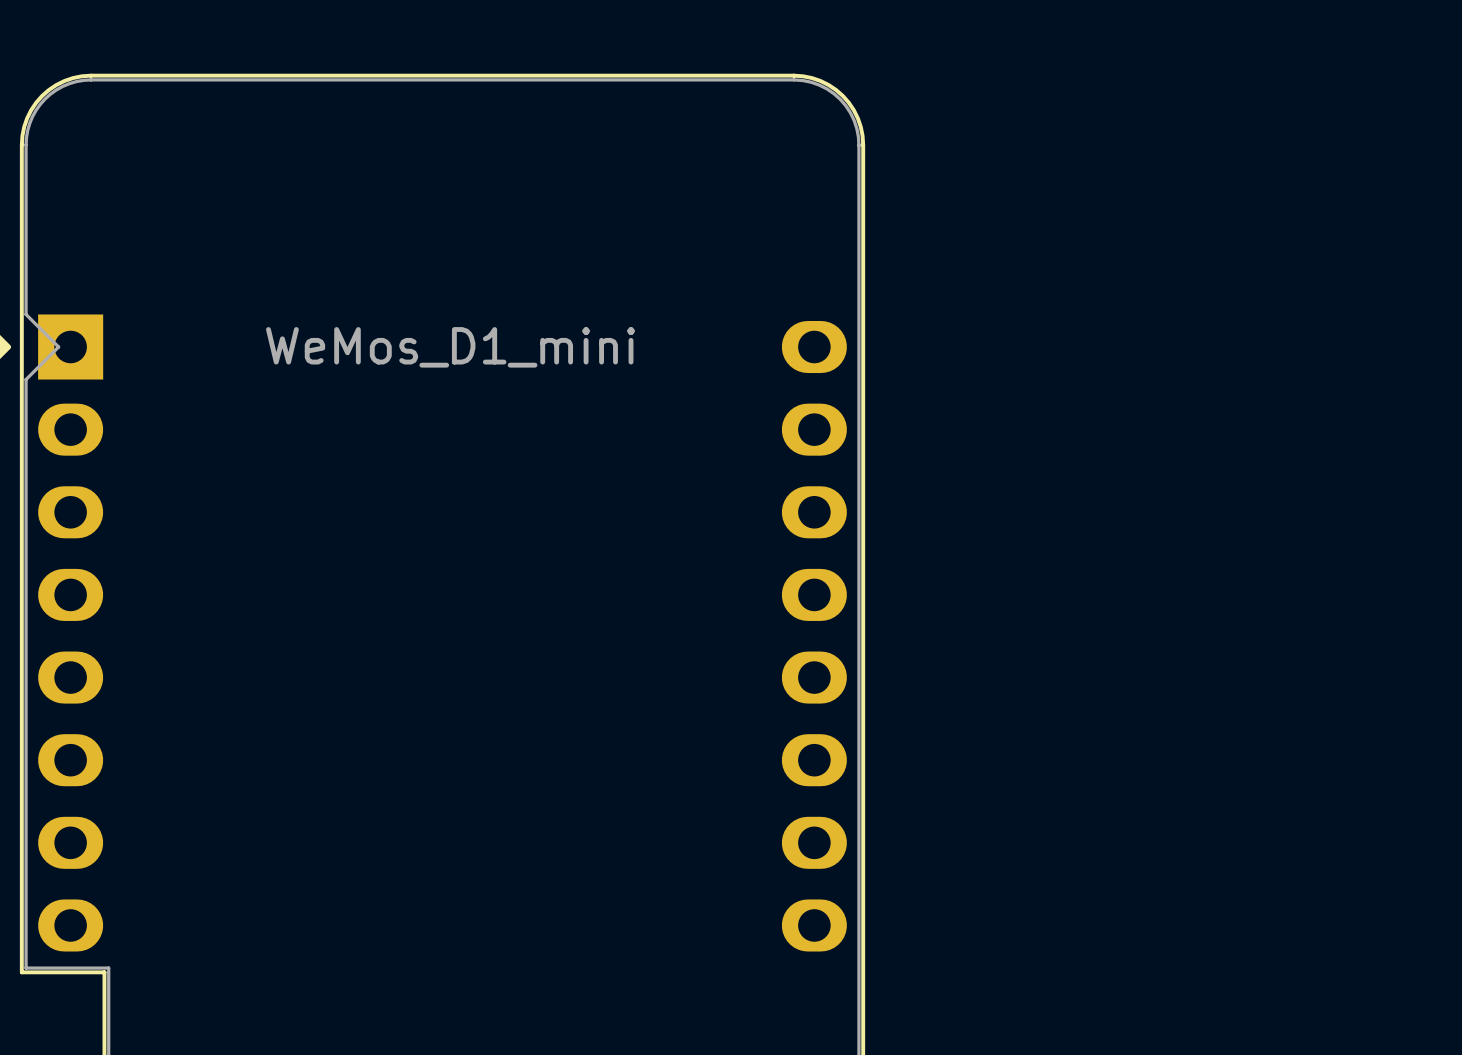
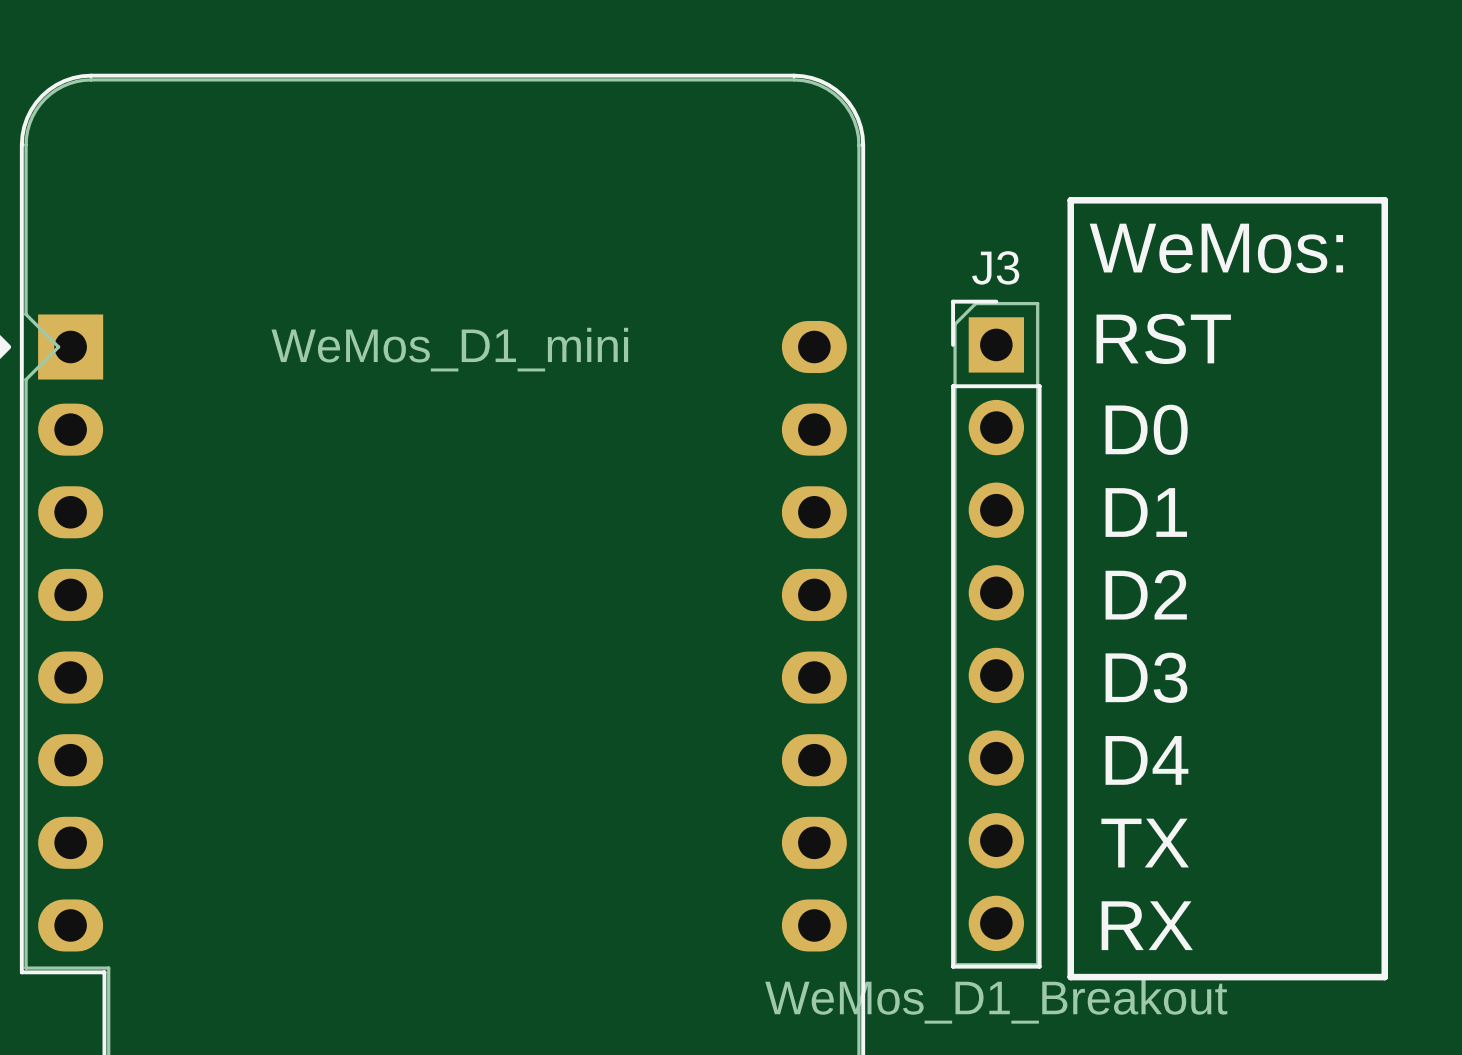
line: none -> (1070, 200) (1384, 200) (1384, 977) (1070, 977) (1070, 200)
text: none -> WeMos: (1216, 248)
text: none -> RST (1163, 338)
text: none -> D0 (1146, 429)
text: none -> D1 (1146, 512)
text: none -> D2 (1146, 594)
J3: none -> WeMos_D1_Breakout (996, 634)
text: none -> D3 (1146, 677)
text: none -> D4 (1146, 760)
text: none -> TX (1145, 843)
text: none -> RX (1147, 925)

